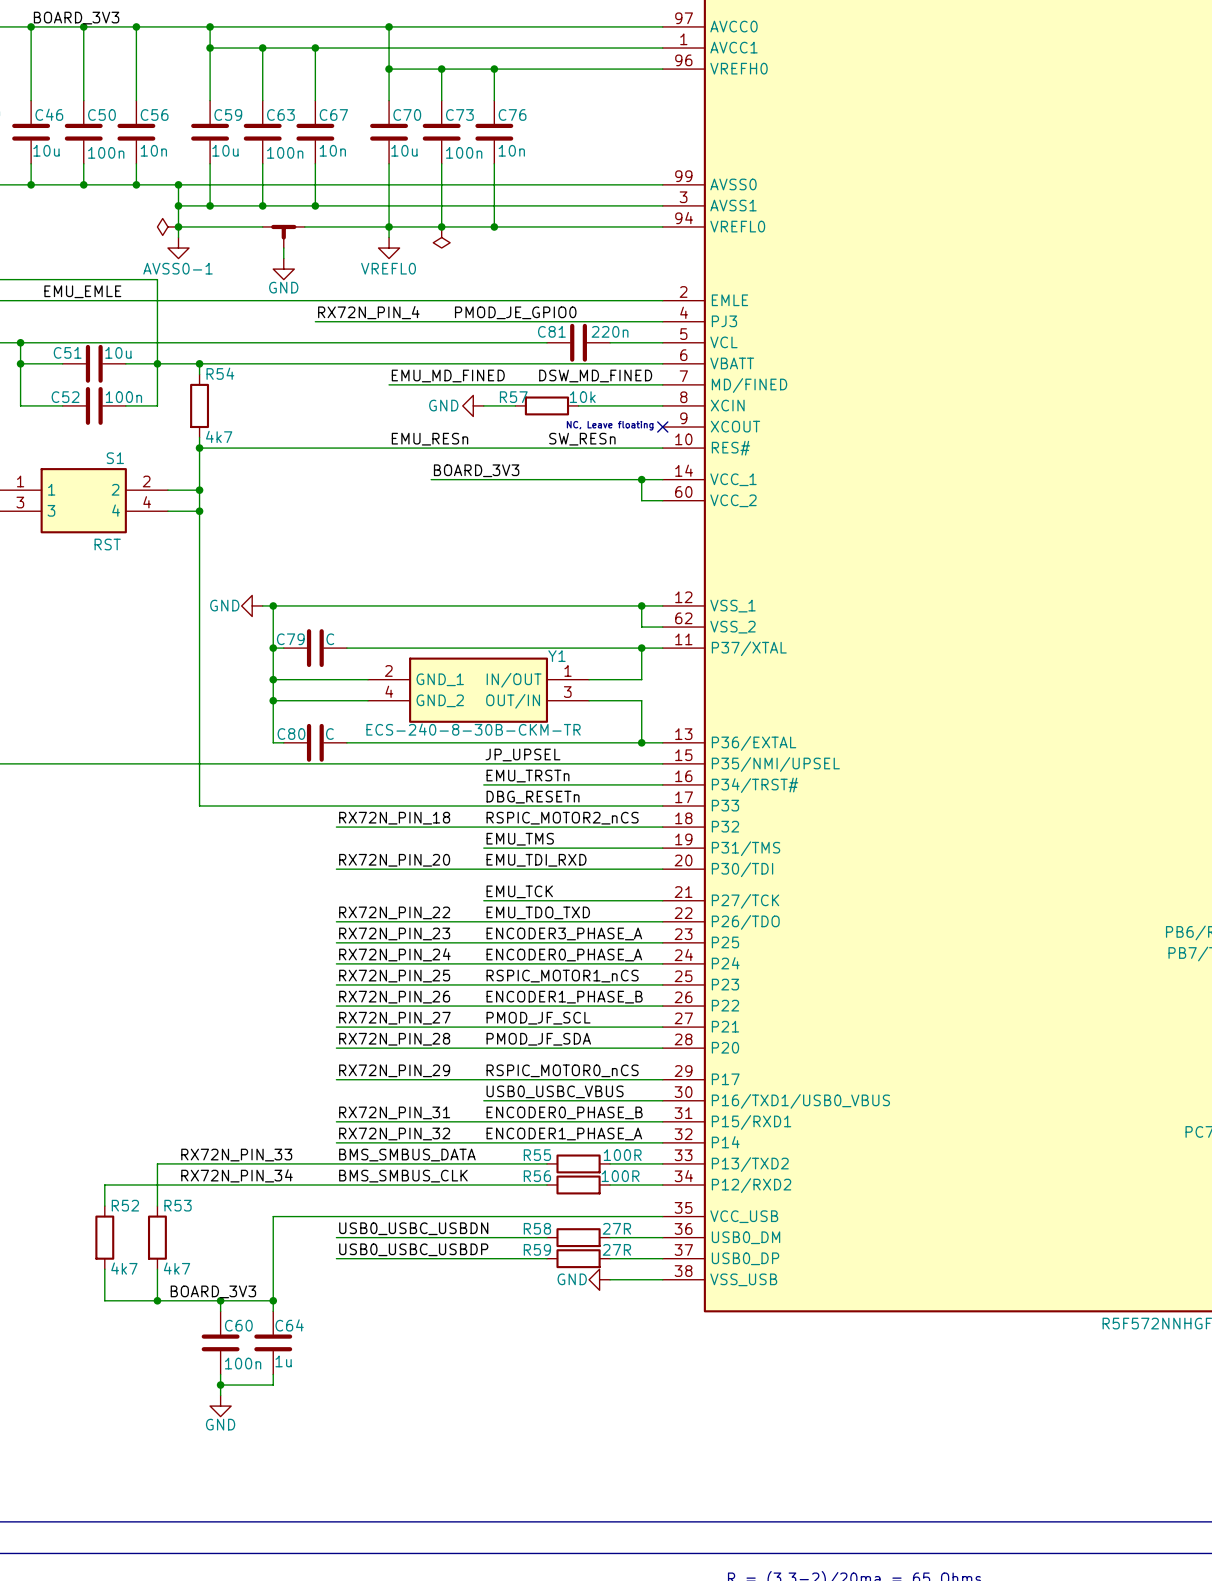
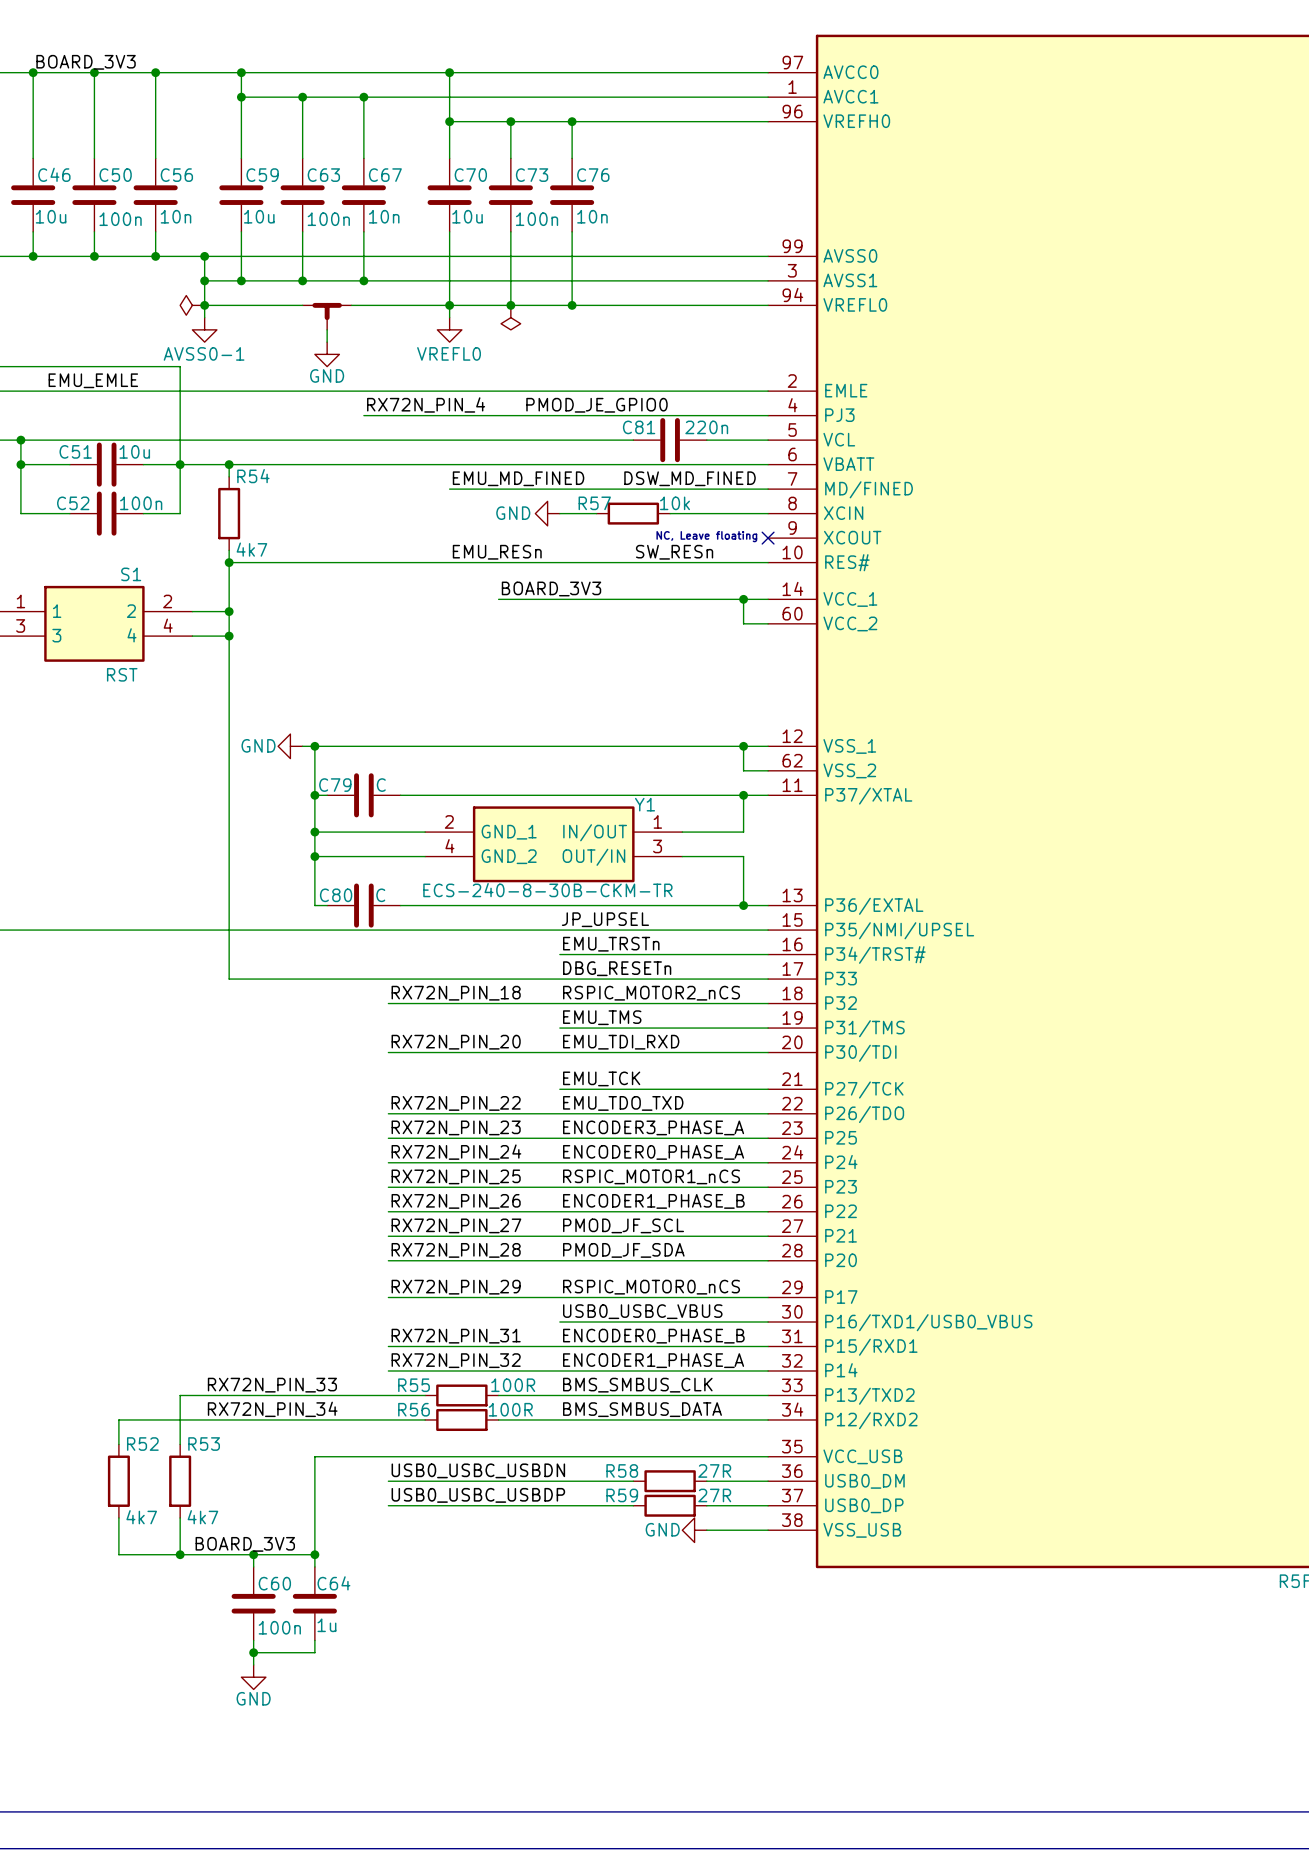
label position: BMS_SMBUS_DATA (407, 1155) -> BMS_SMBUS_DATA (642, 1409)
wire: (367, 1163) (431, 1163) -> (633, 1395) (706, 1395)
R55 position: (578, 1163) -> (461, 1395)
label position: BMS_SMBUS_CLK (403, 1176) -> BMS_SMBUS_CLK (637, 1385)
wire: (367, 1184) (431, 1184) -> (633, 1419) (706, 1419)
R56 position: (578, 1184) -> (461, 1419)

